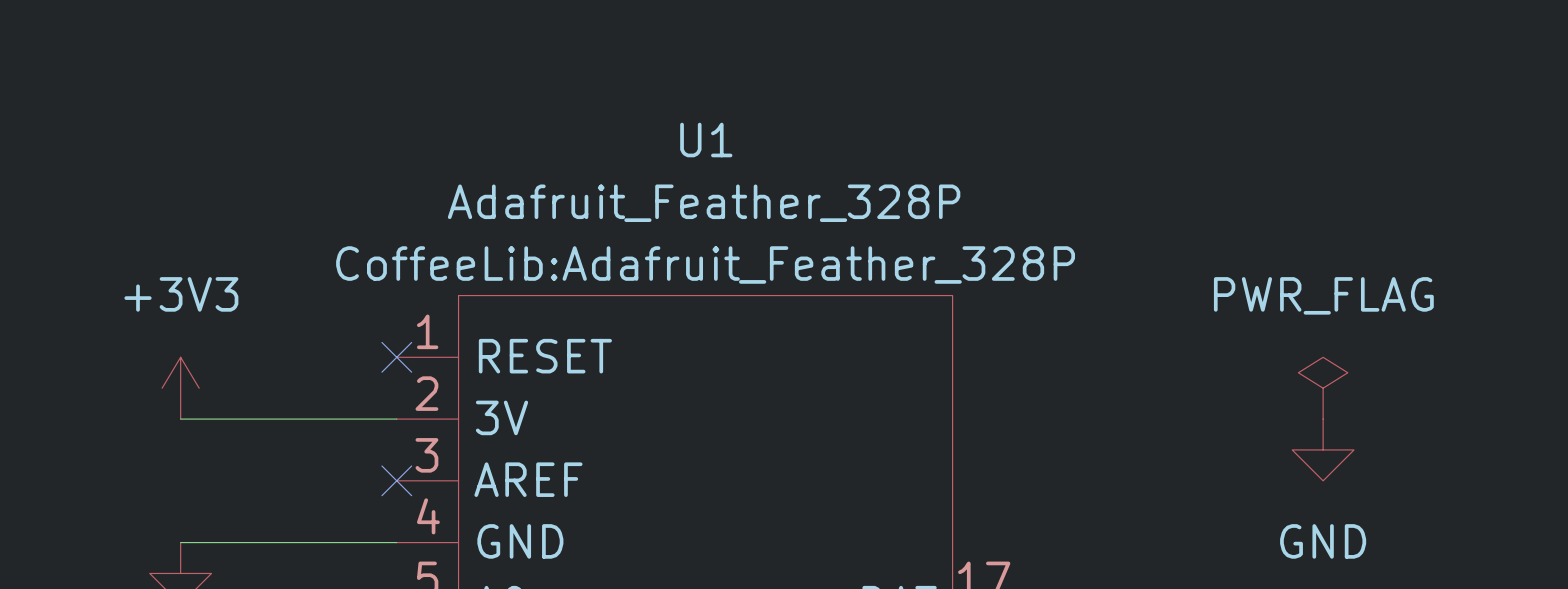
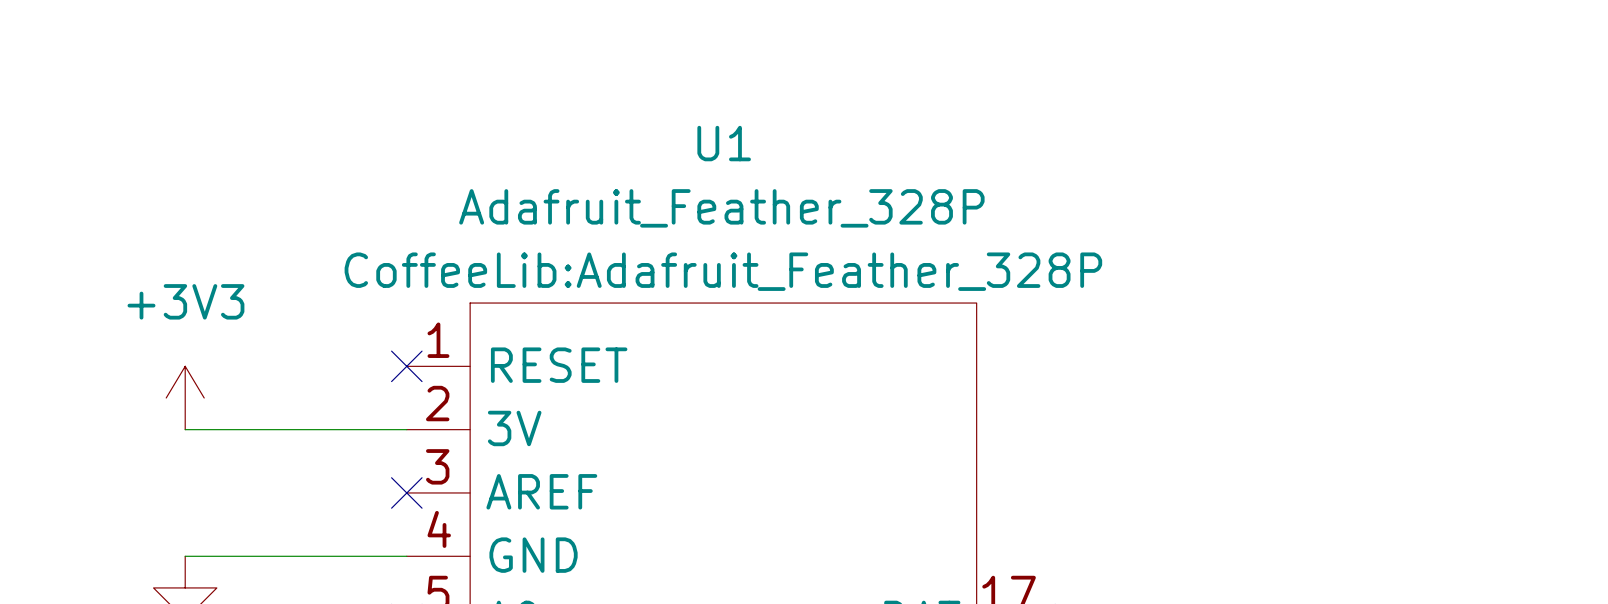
power symbol: PWR_FLAG (1323, 388) -> none
power symbol: GND (1323, 449) -> none

